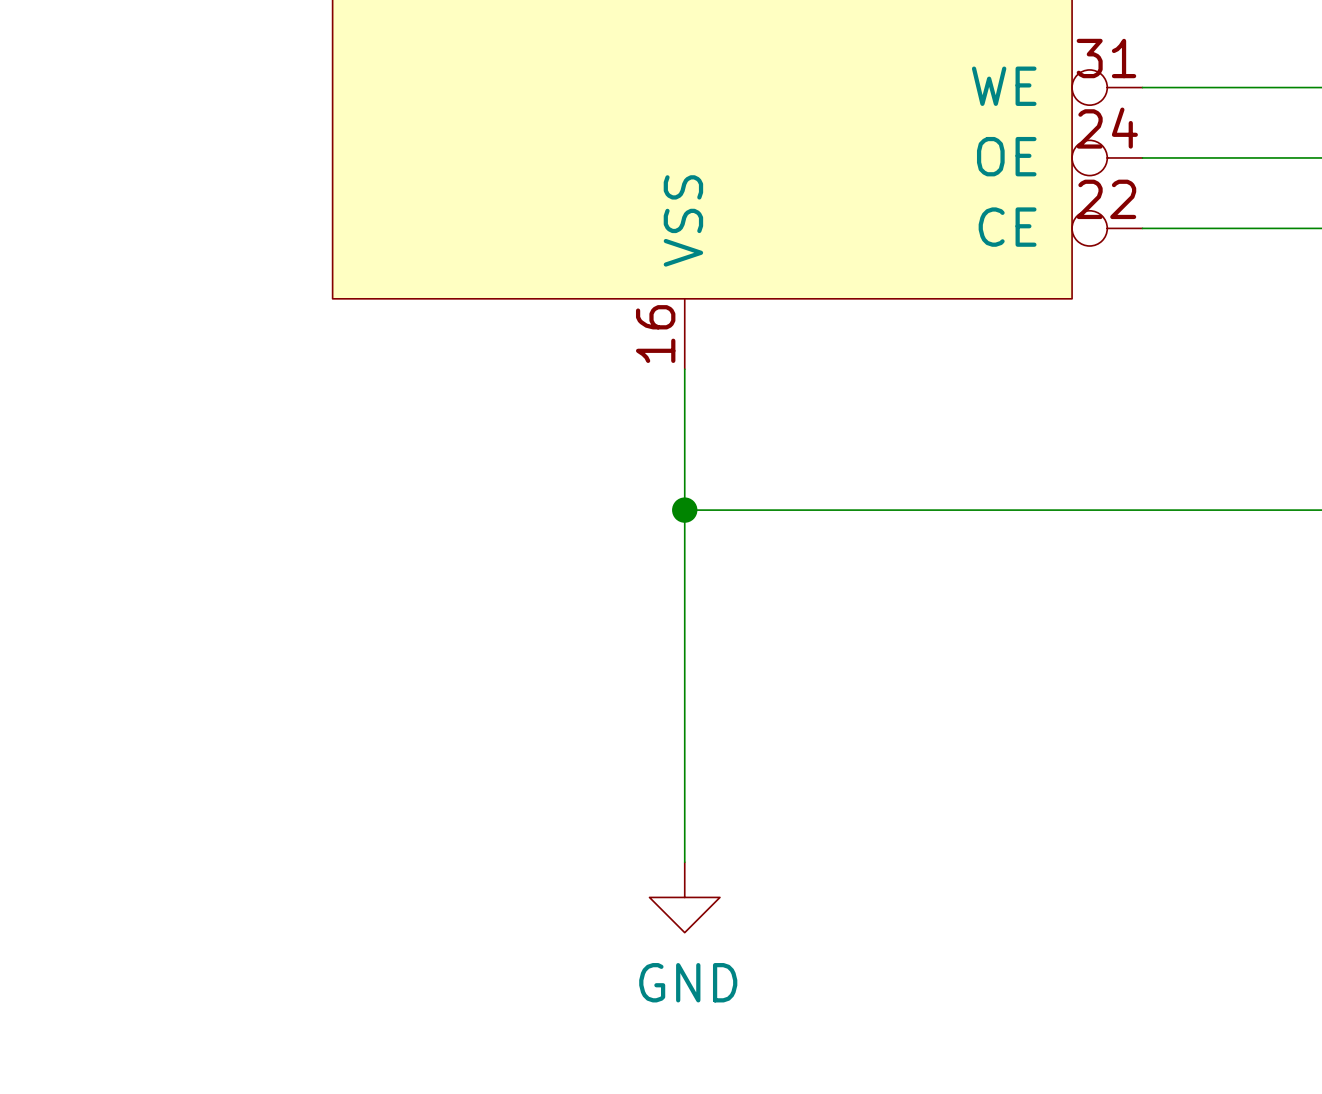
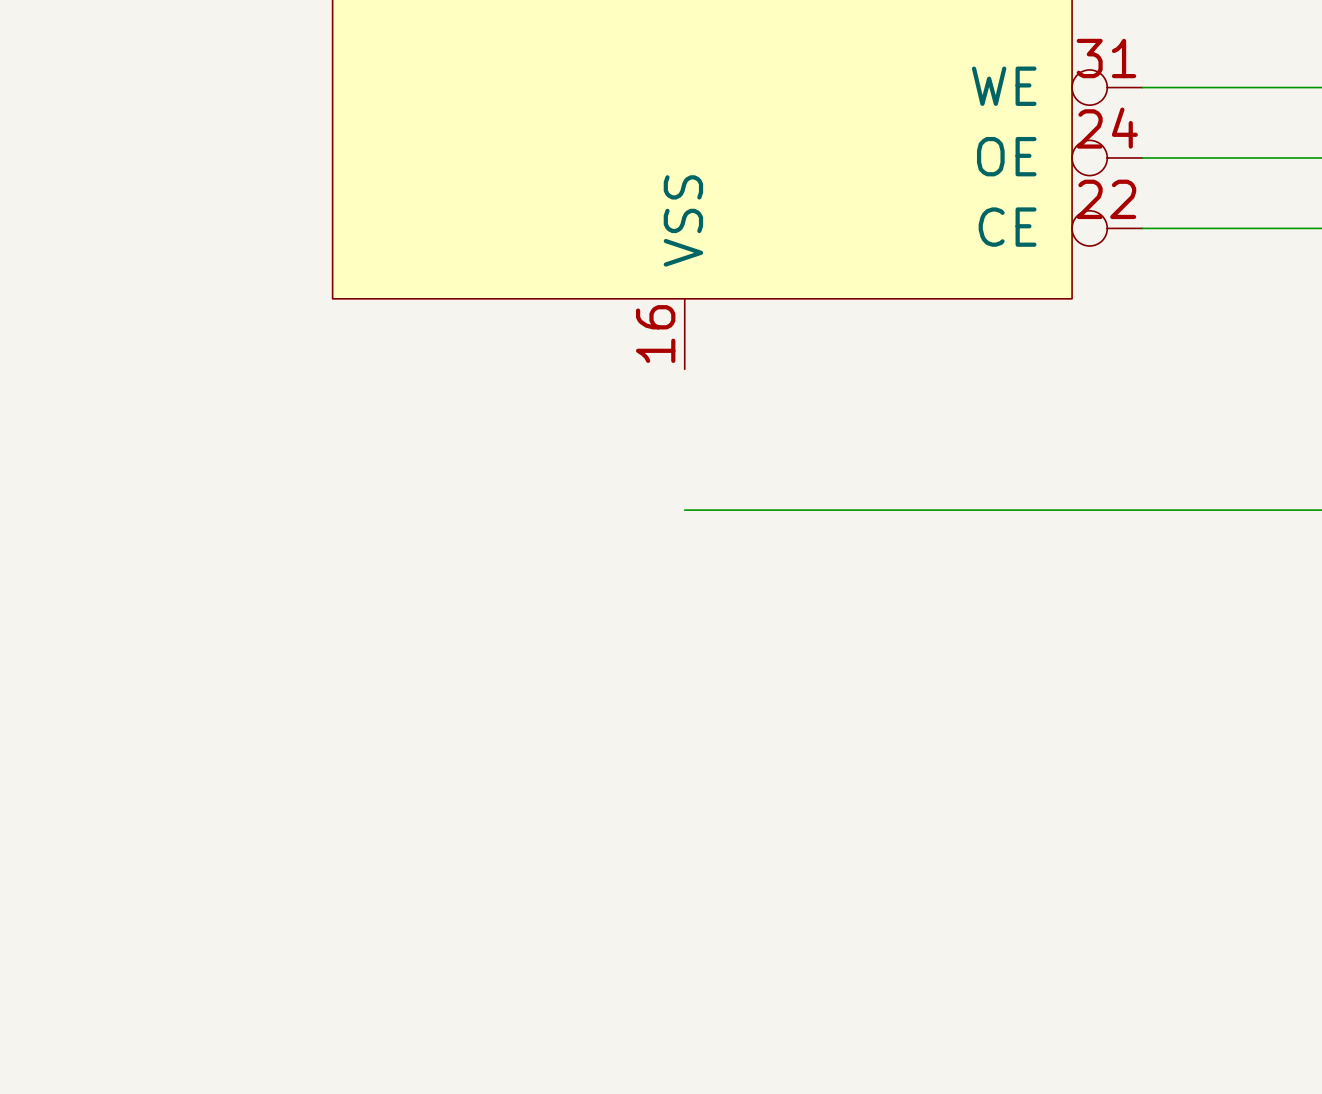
wire: (684, 369) (684, 862) -> none
junction: (684, 510) -> none
power symbol: GND (684, 897) -> none

